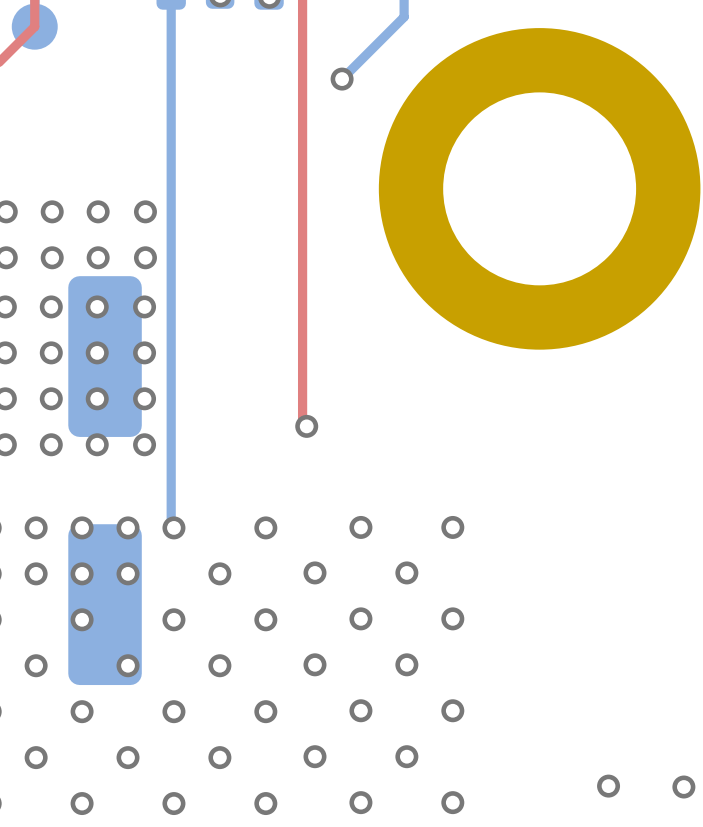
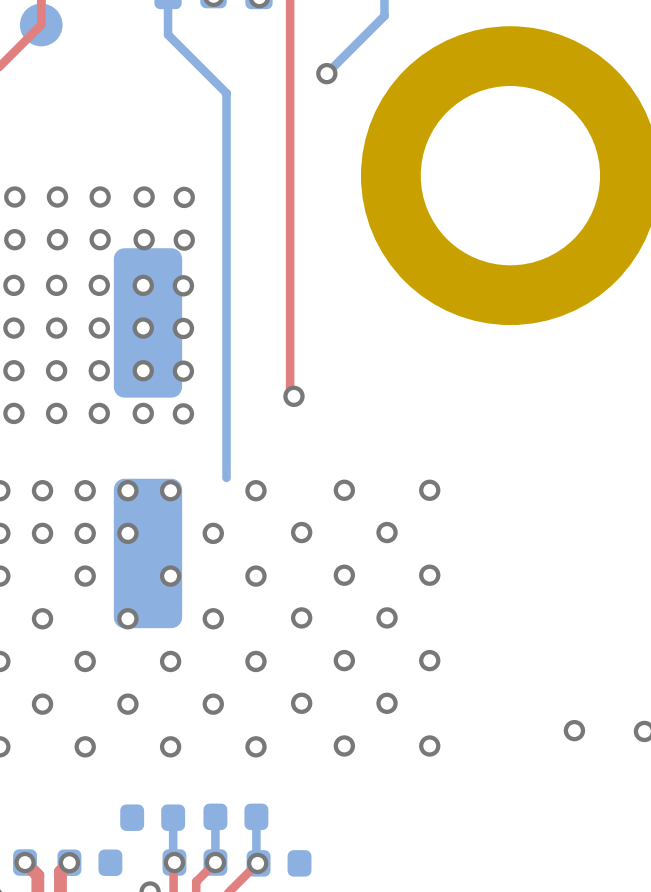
bottom track: (171, 37) (171, 525) (173, 527) -> (168, 34) (226, 93) (226, 477)
via: none -> (184, 197)
via: none -> (184, 240)
via: none -> (183, 285)
via: none -> (183, 328)
via: none -> (183, 371)
via: none -> (183, 413)
part position: (105, 480) -> (147, 438)

